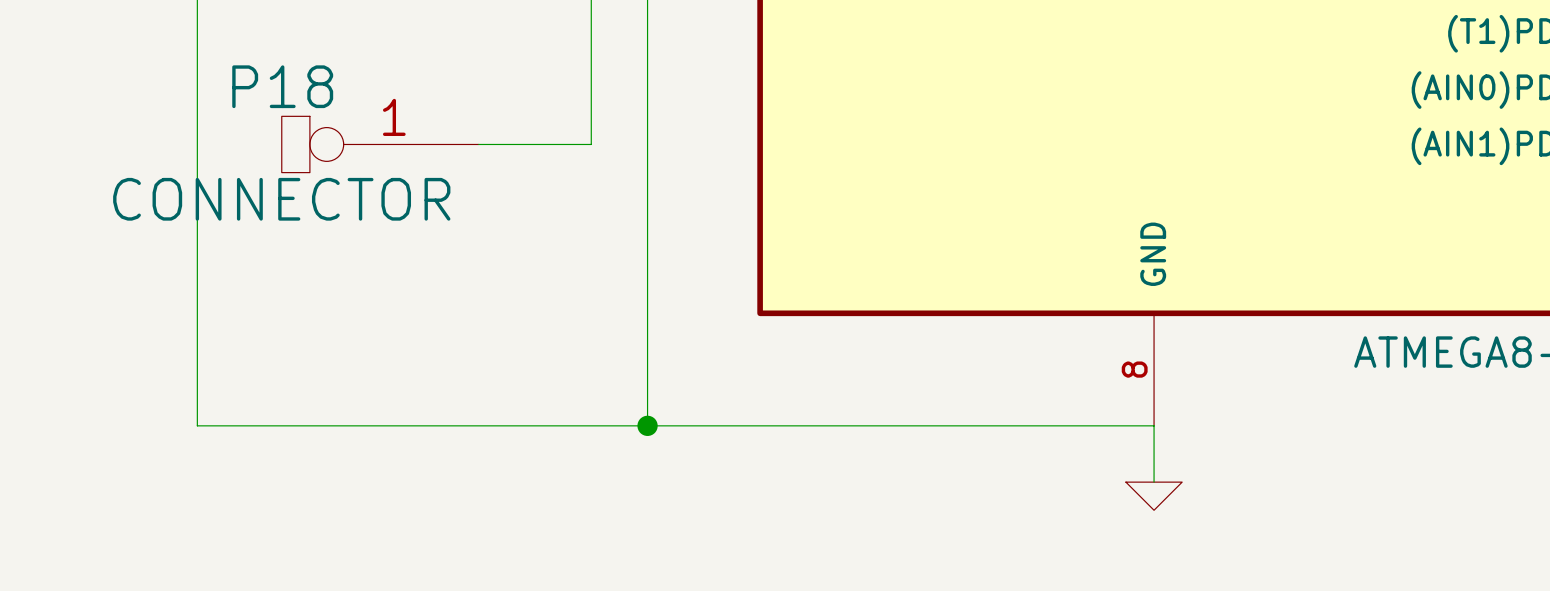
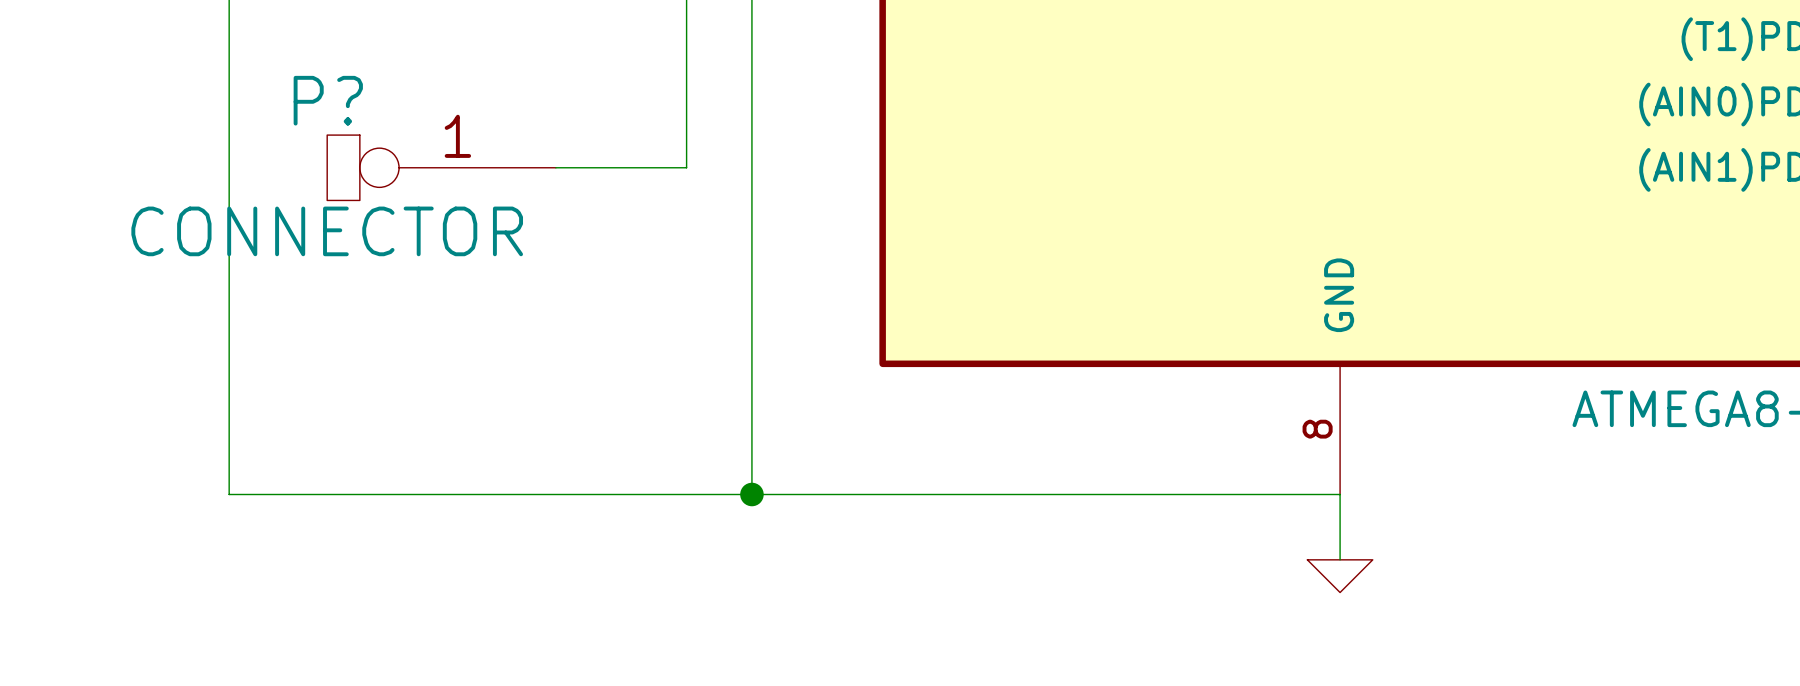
P18 name: P18 (282, 86) -> P? (328, 100)

